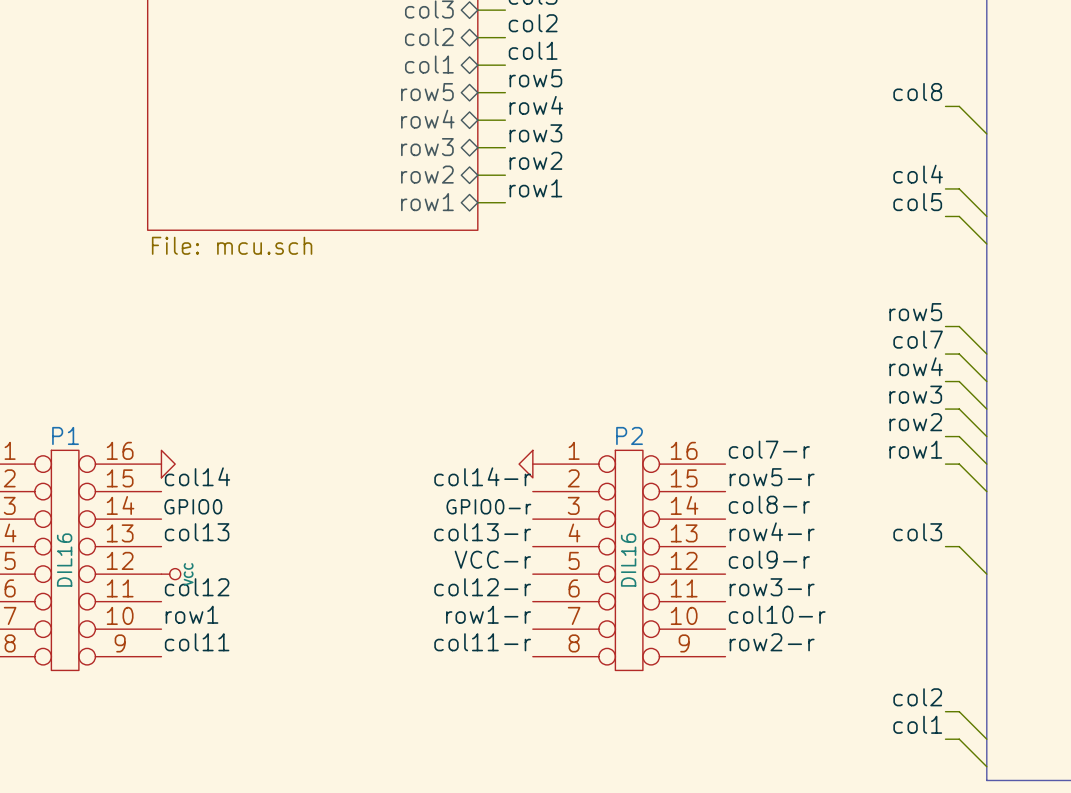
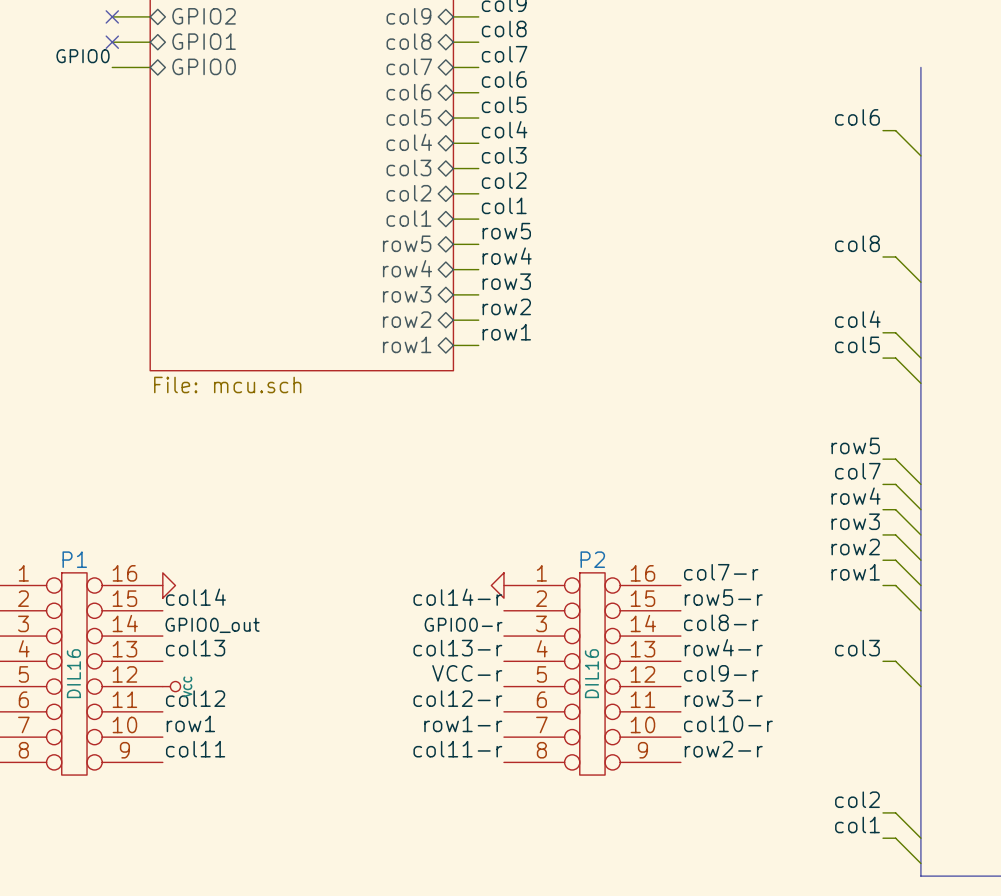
label: GPIO0 (193, 506) -> GPIO0_out (212, 625)

